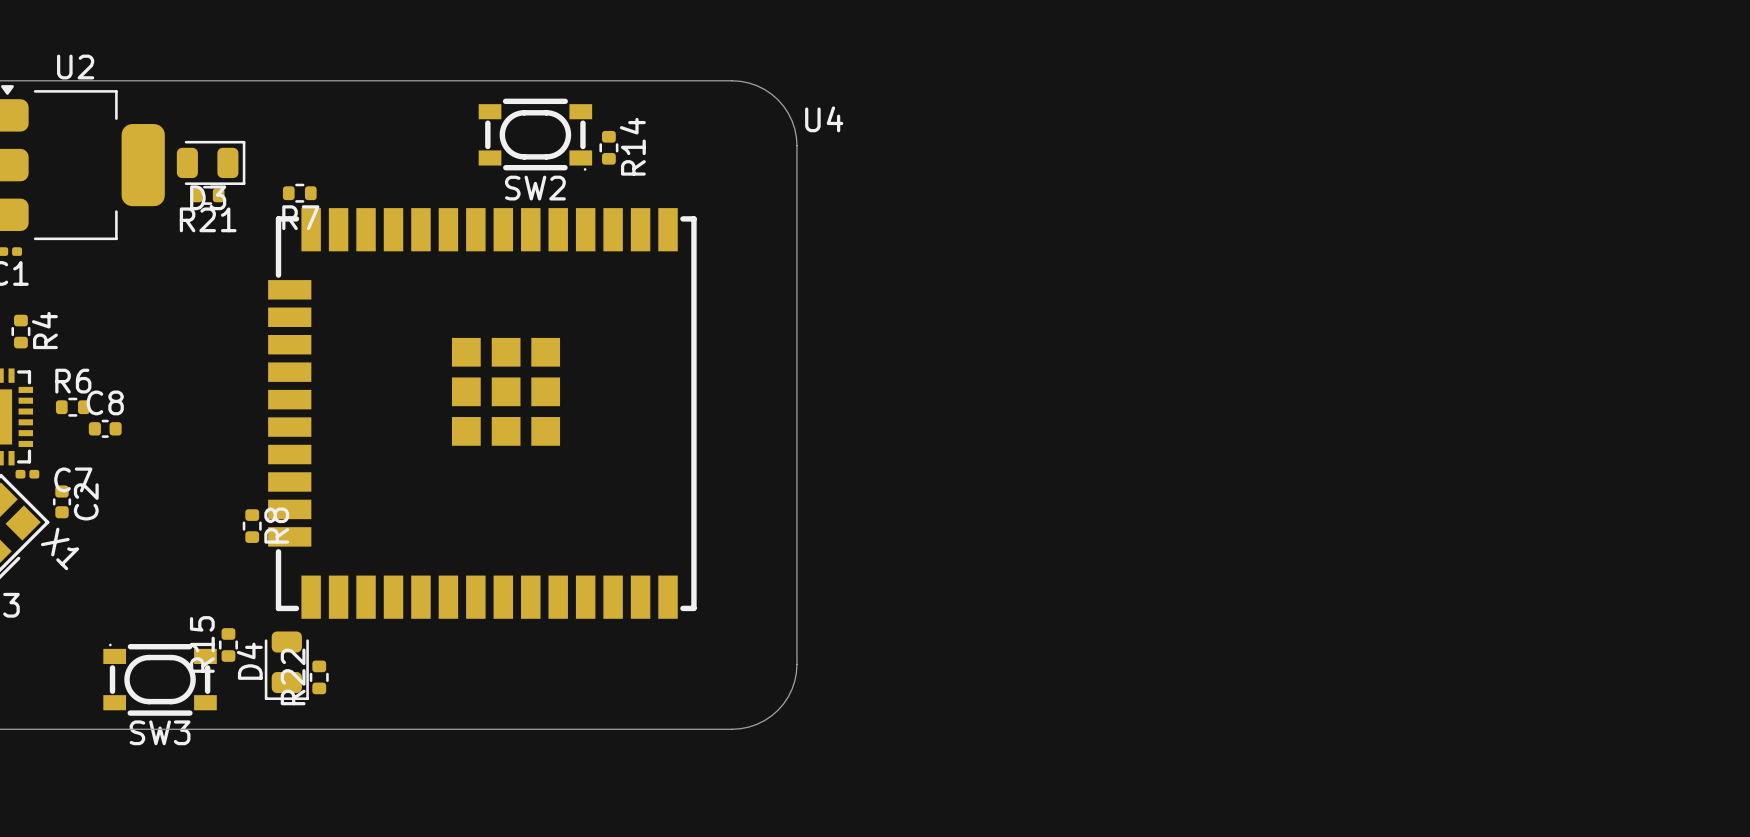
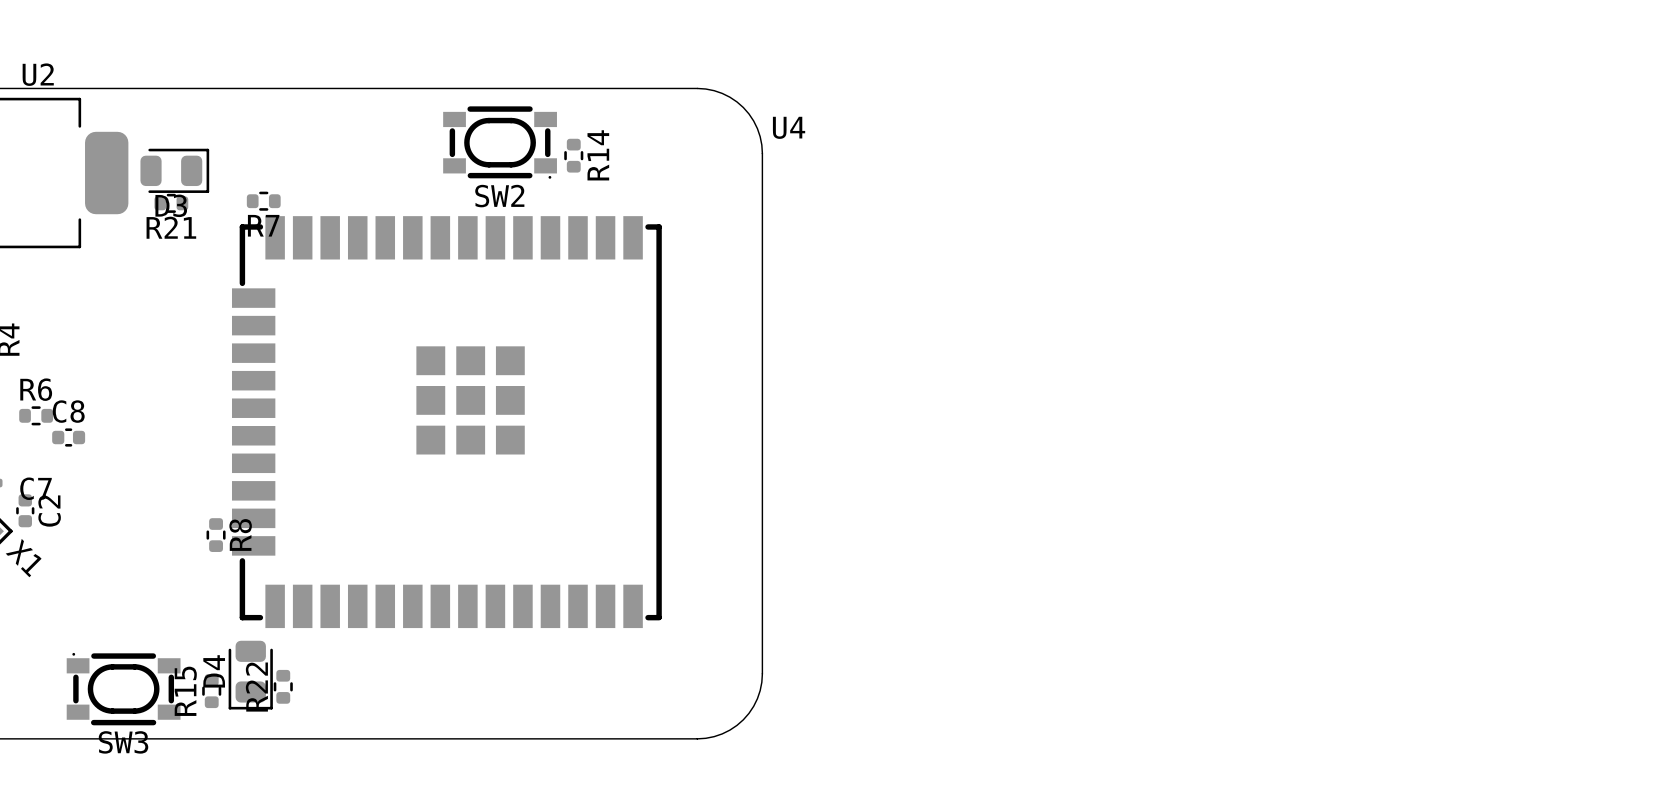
R15 position: (228, 644) -> (211, 691)

